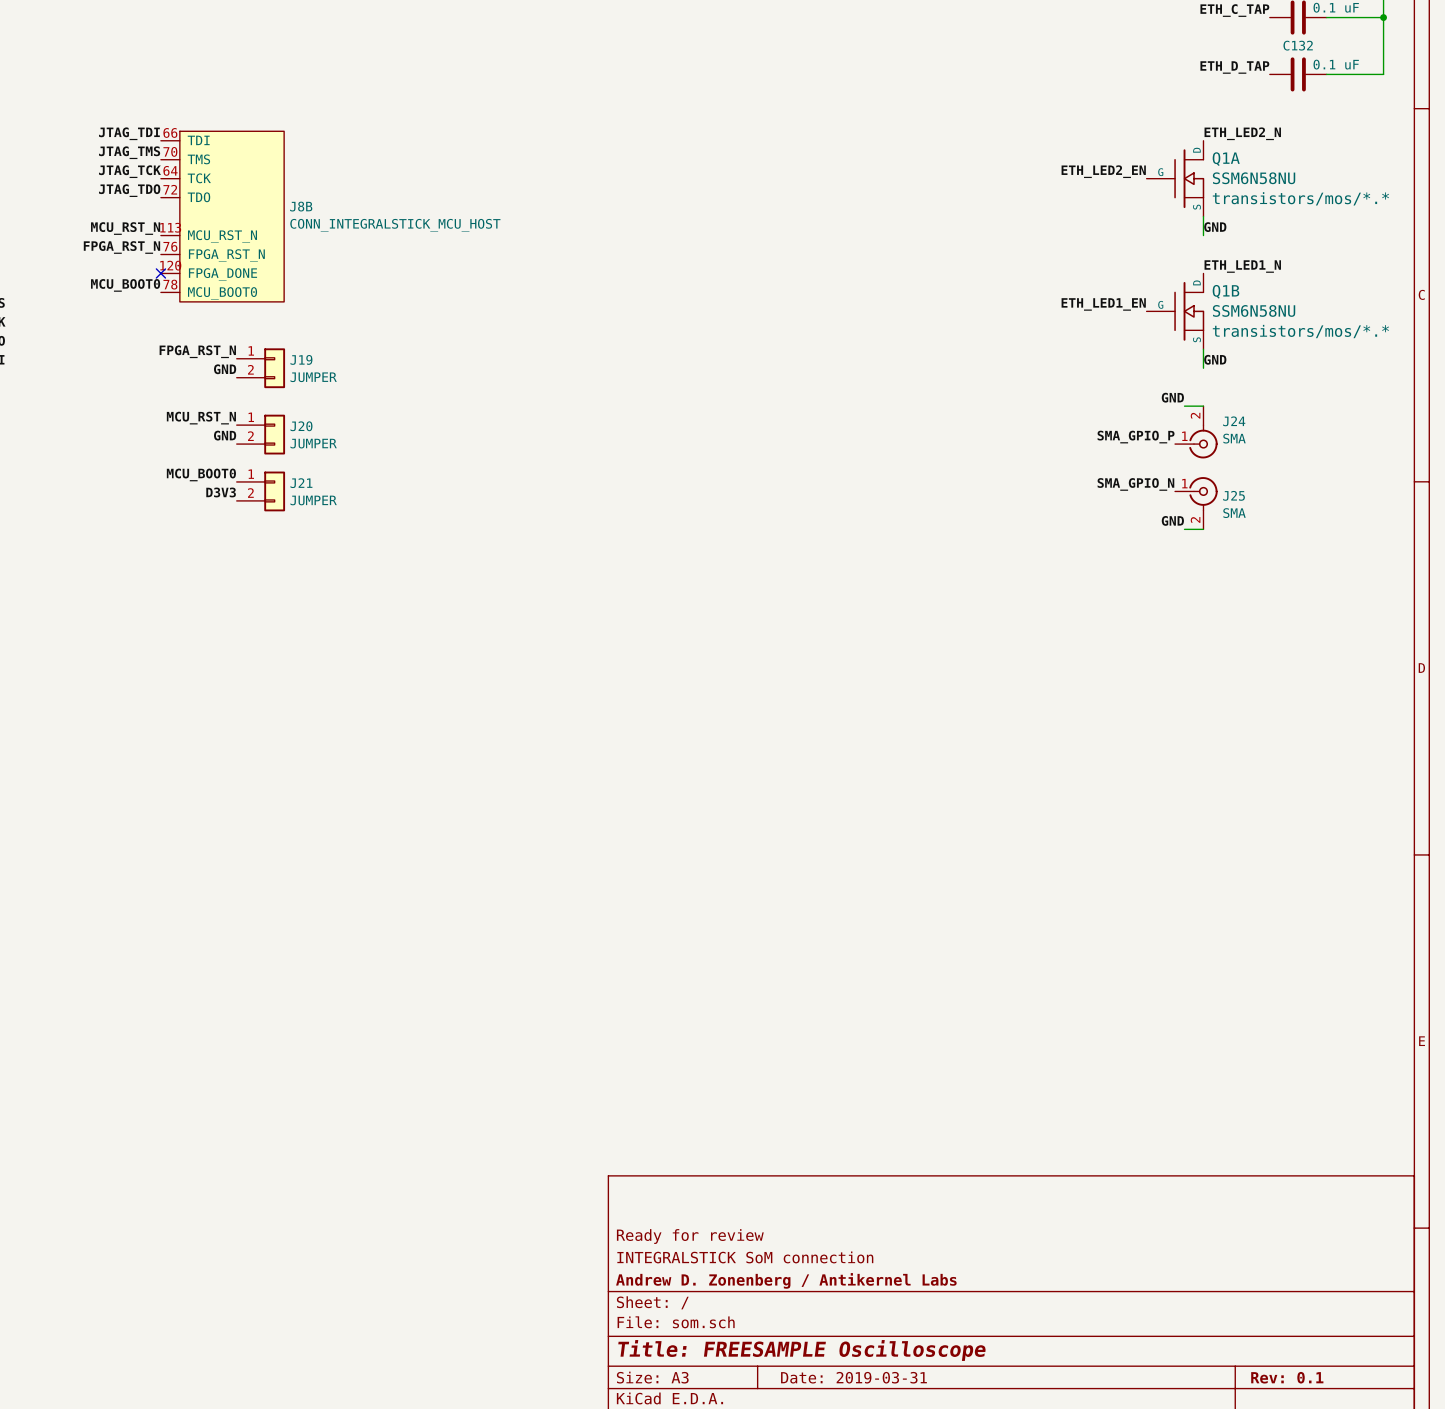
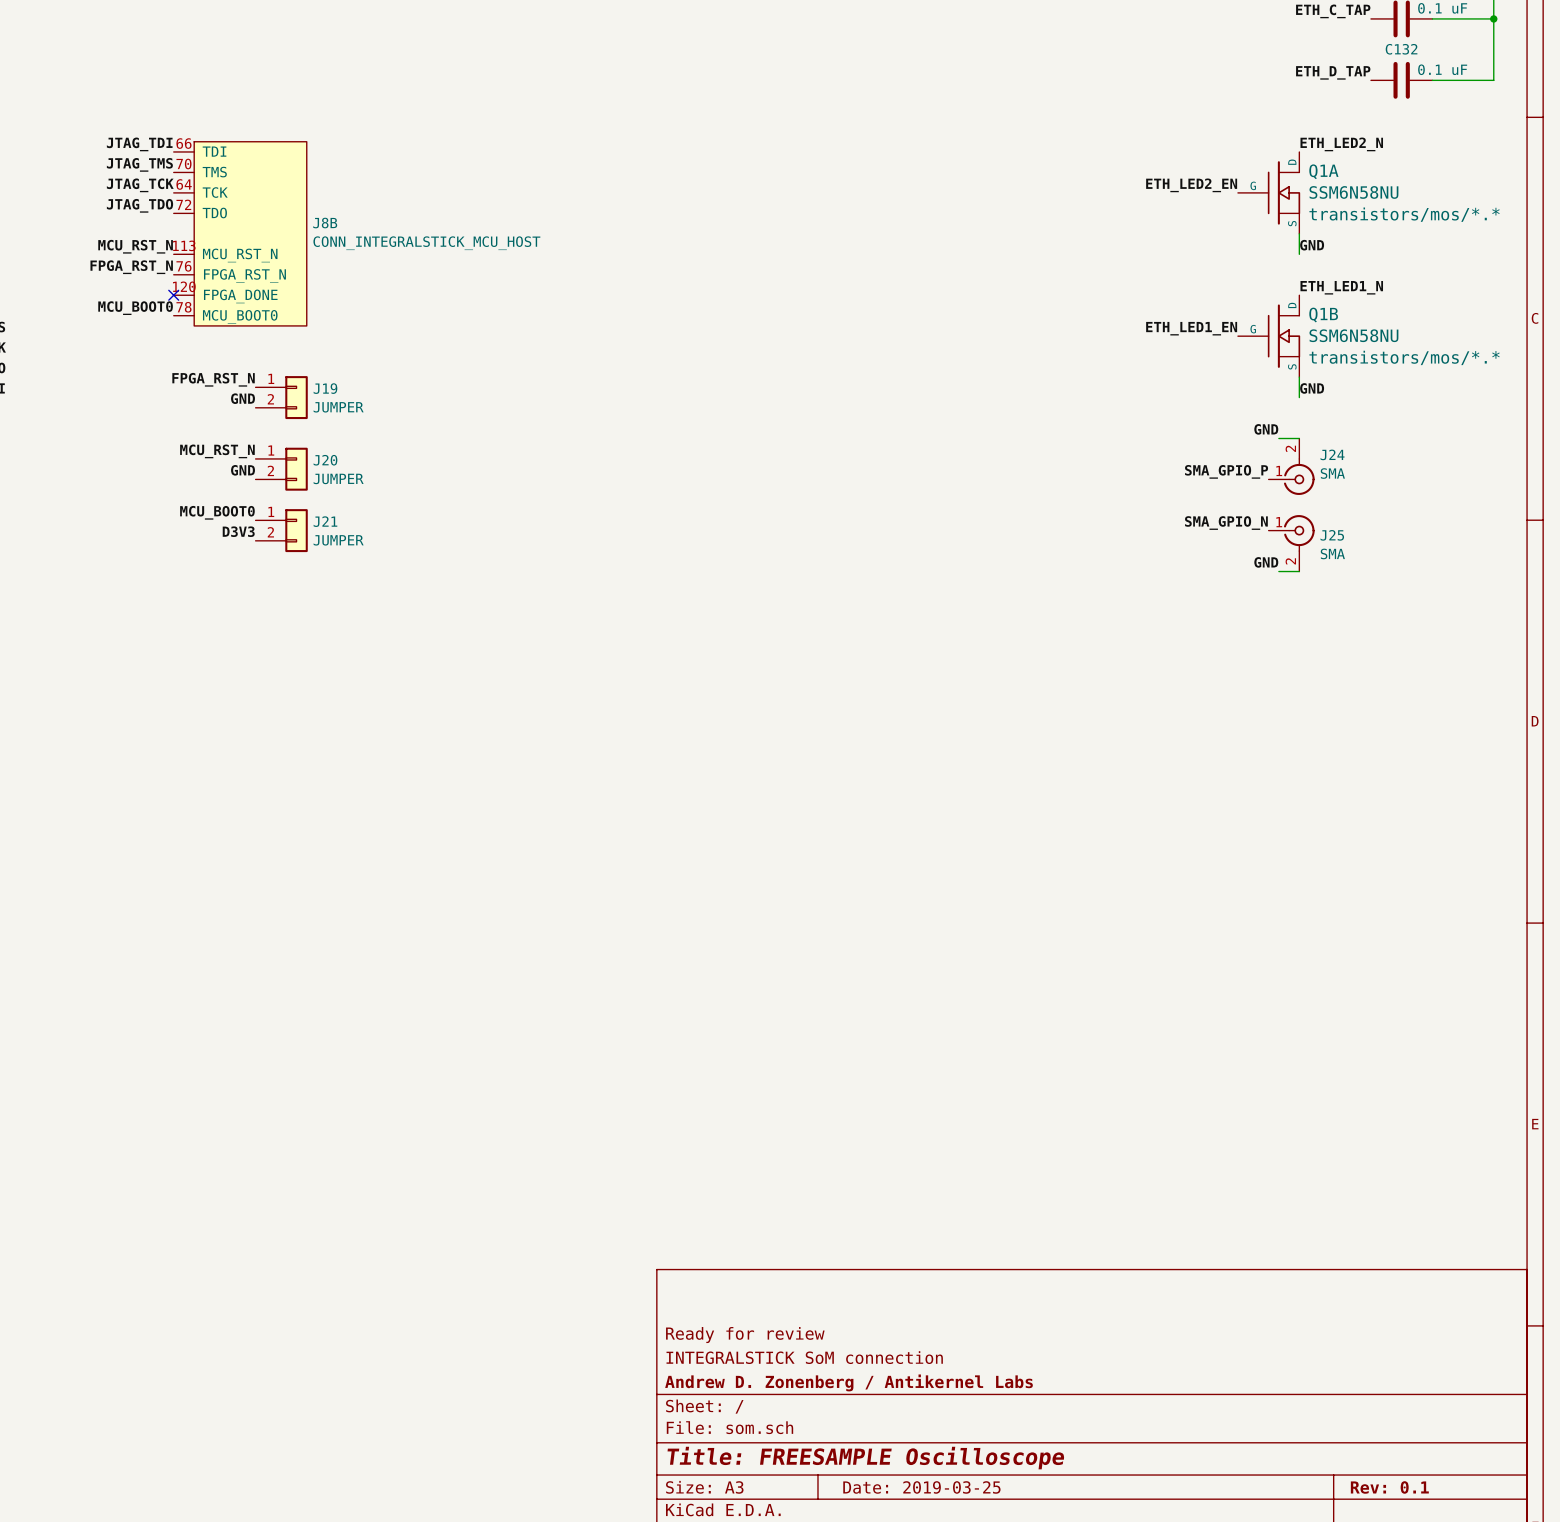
title block: Date: 2019-03-31 (853, 1377) -> Date: 2019-03-25 (921, 1487)

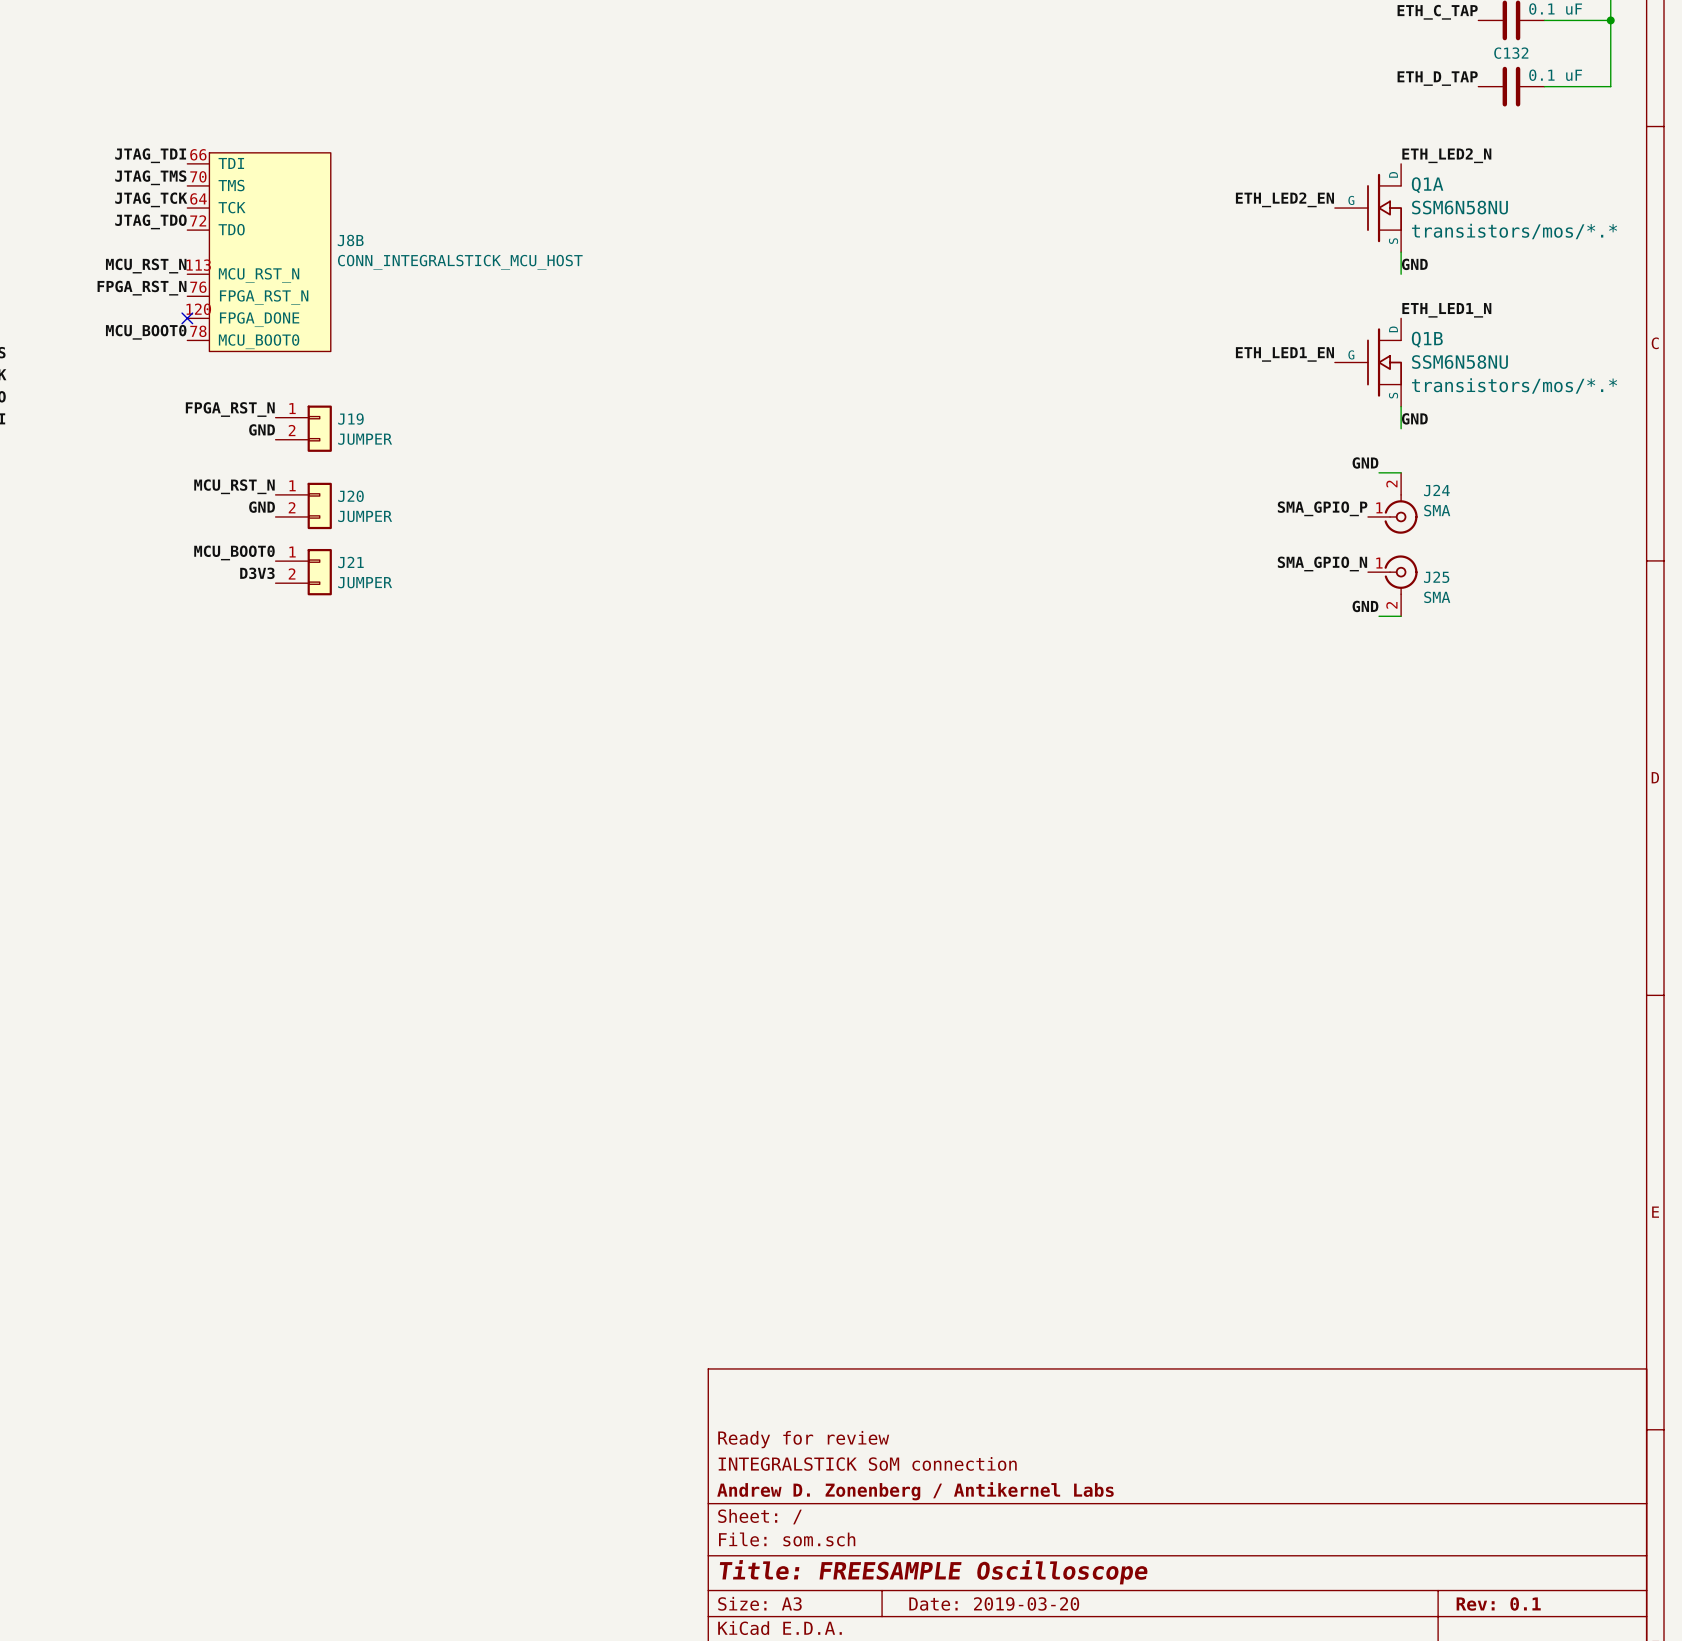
title block: Date: 2019-03-25 (921, 1487) -> Date: 2019-03-20 (994, 1603)

